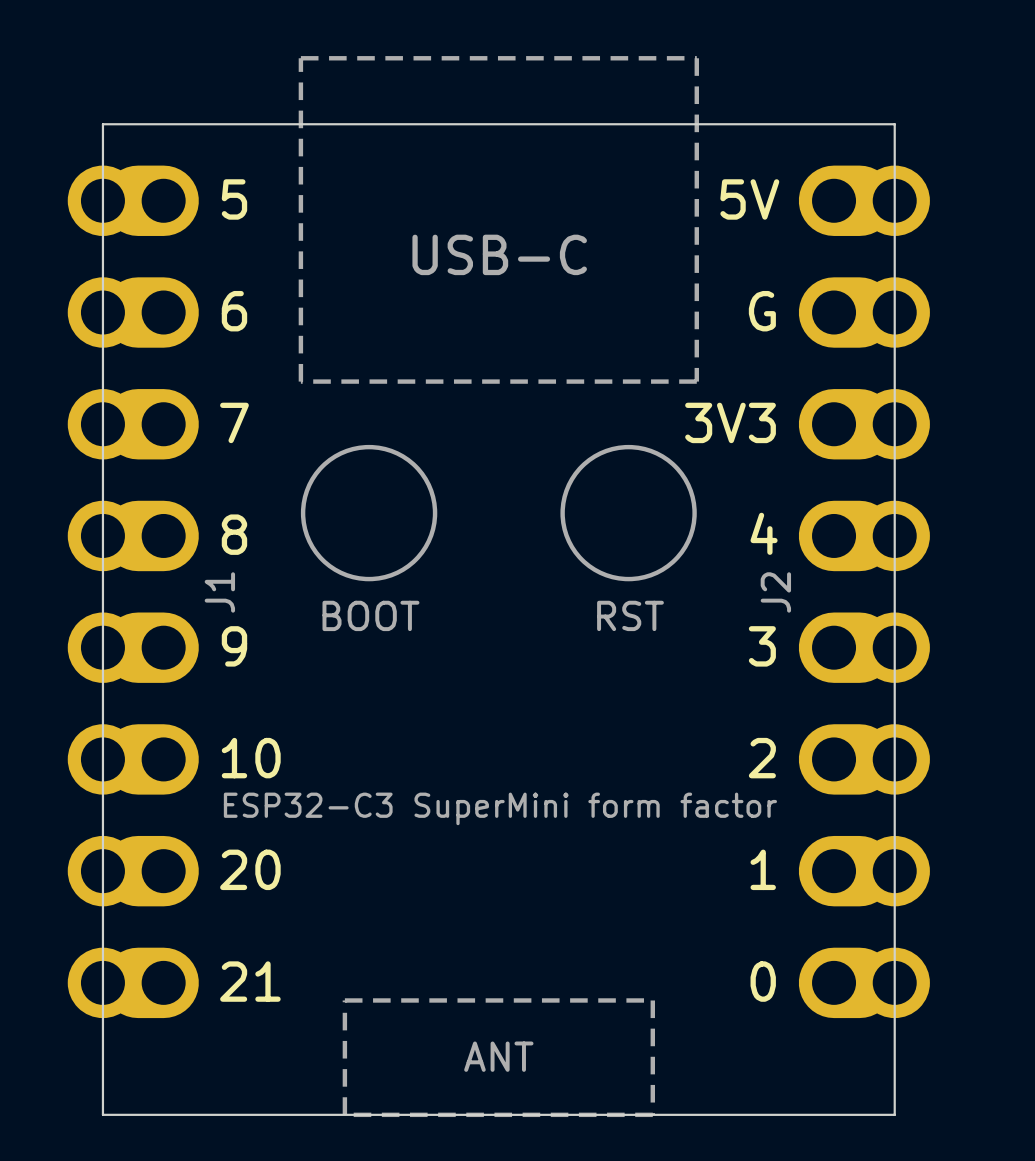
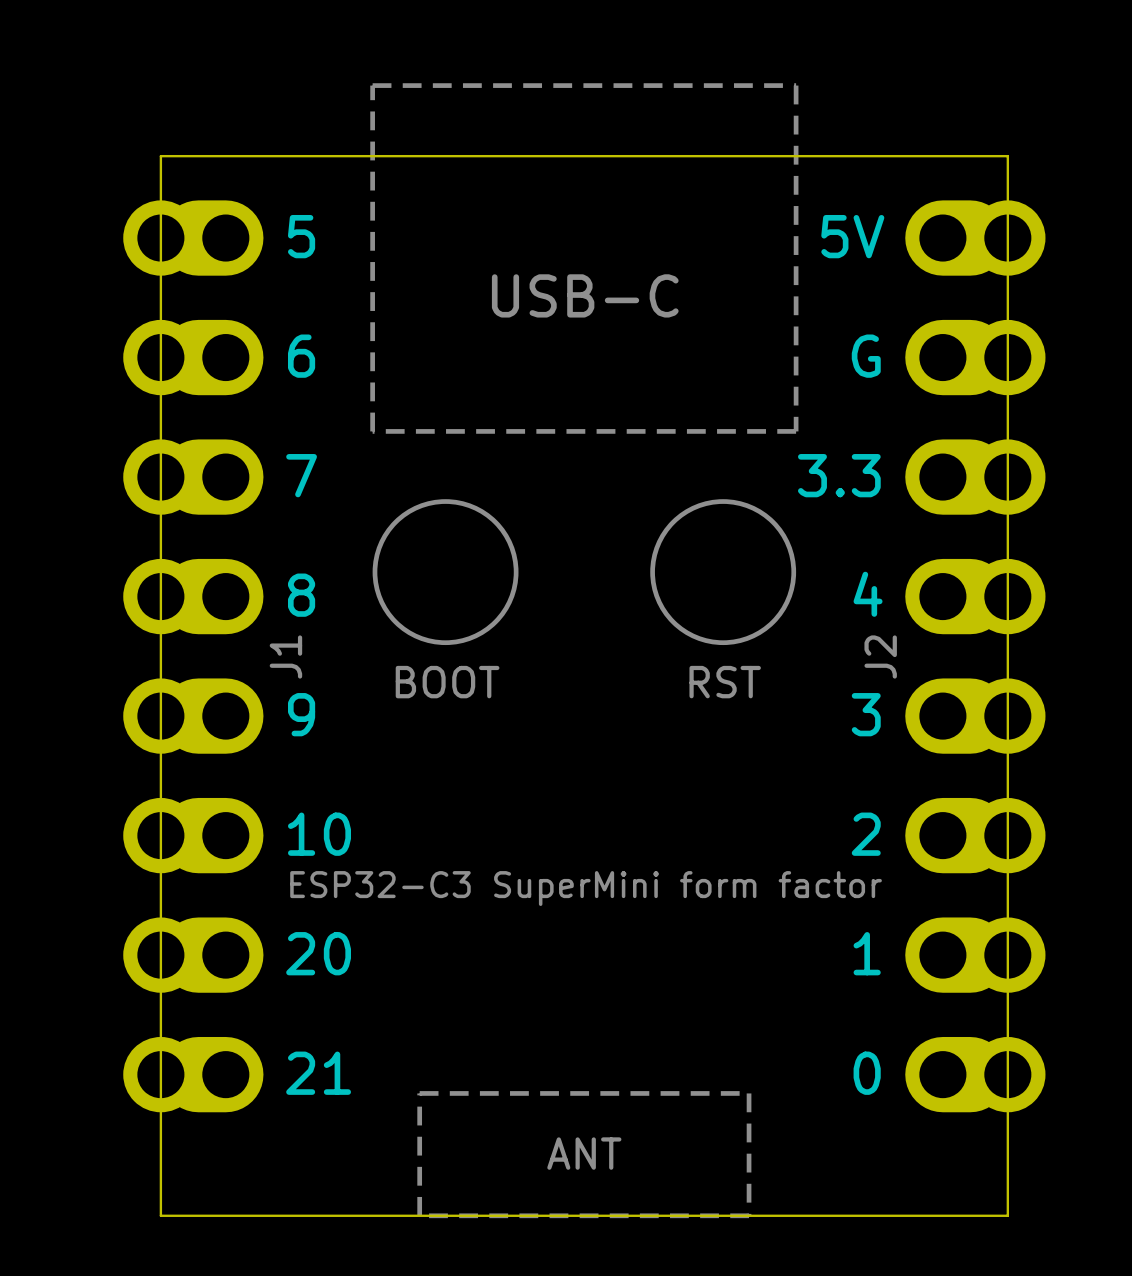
text: 3V3 (730, 422) -> 3.3 (839, 475)

